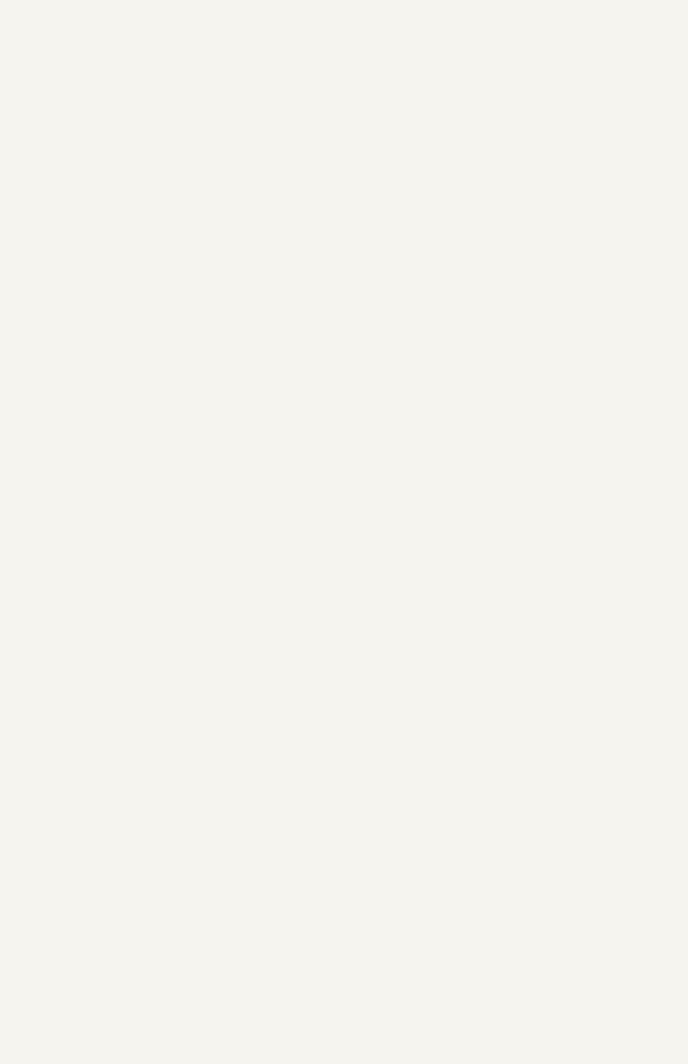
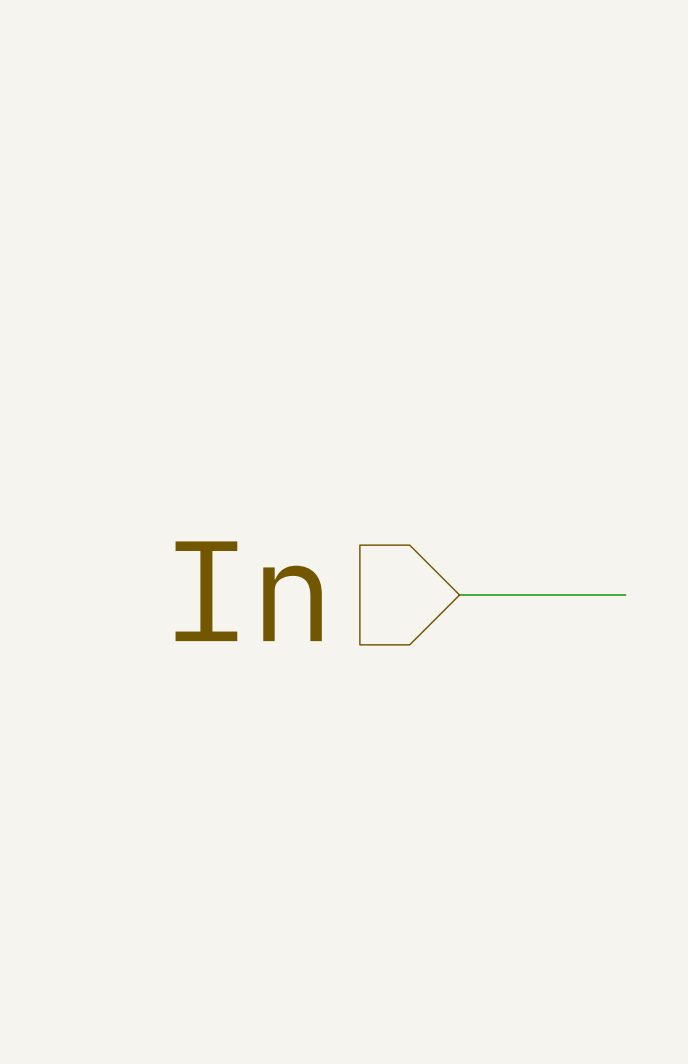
hierarchical label: none -> In (248, 591)
wire: none -> (459, 595) (625, 595)

